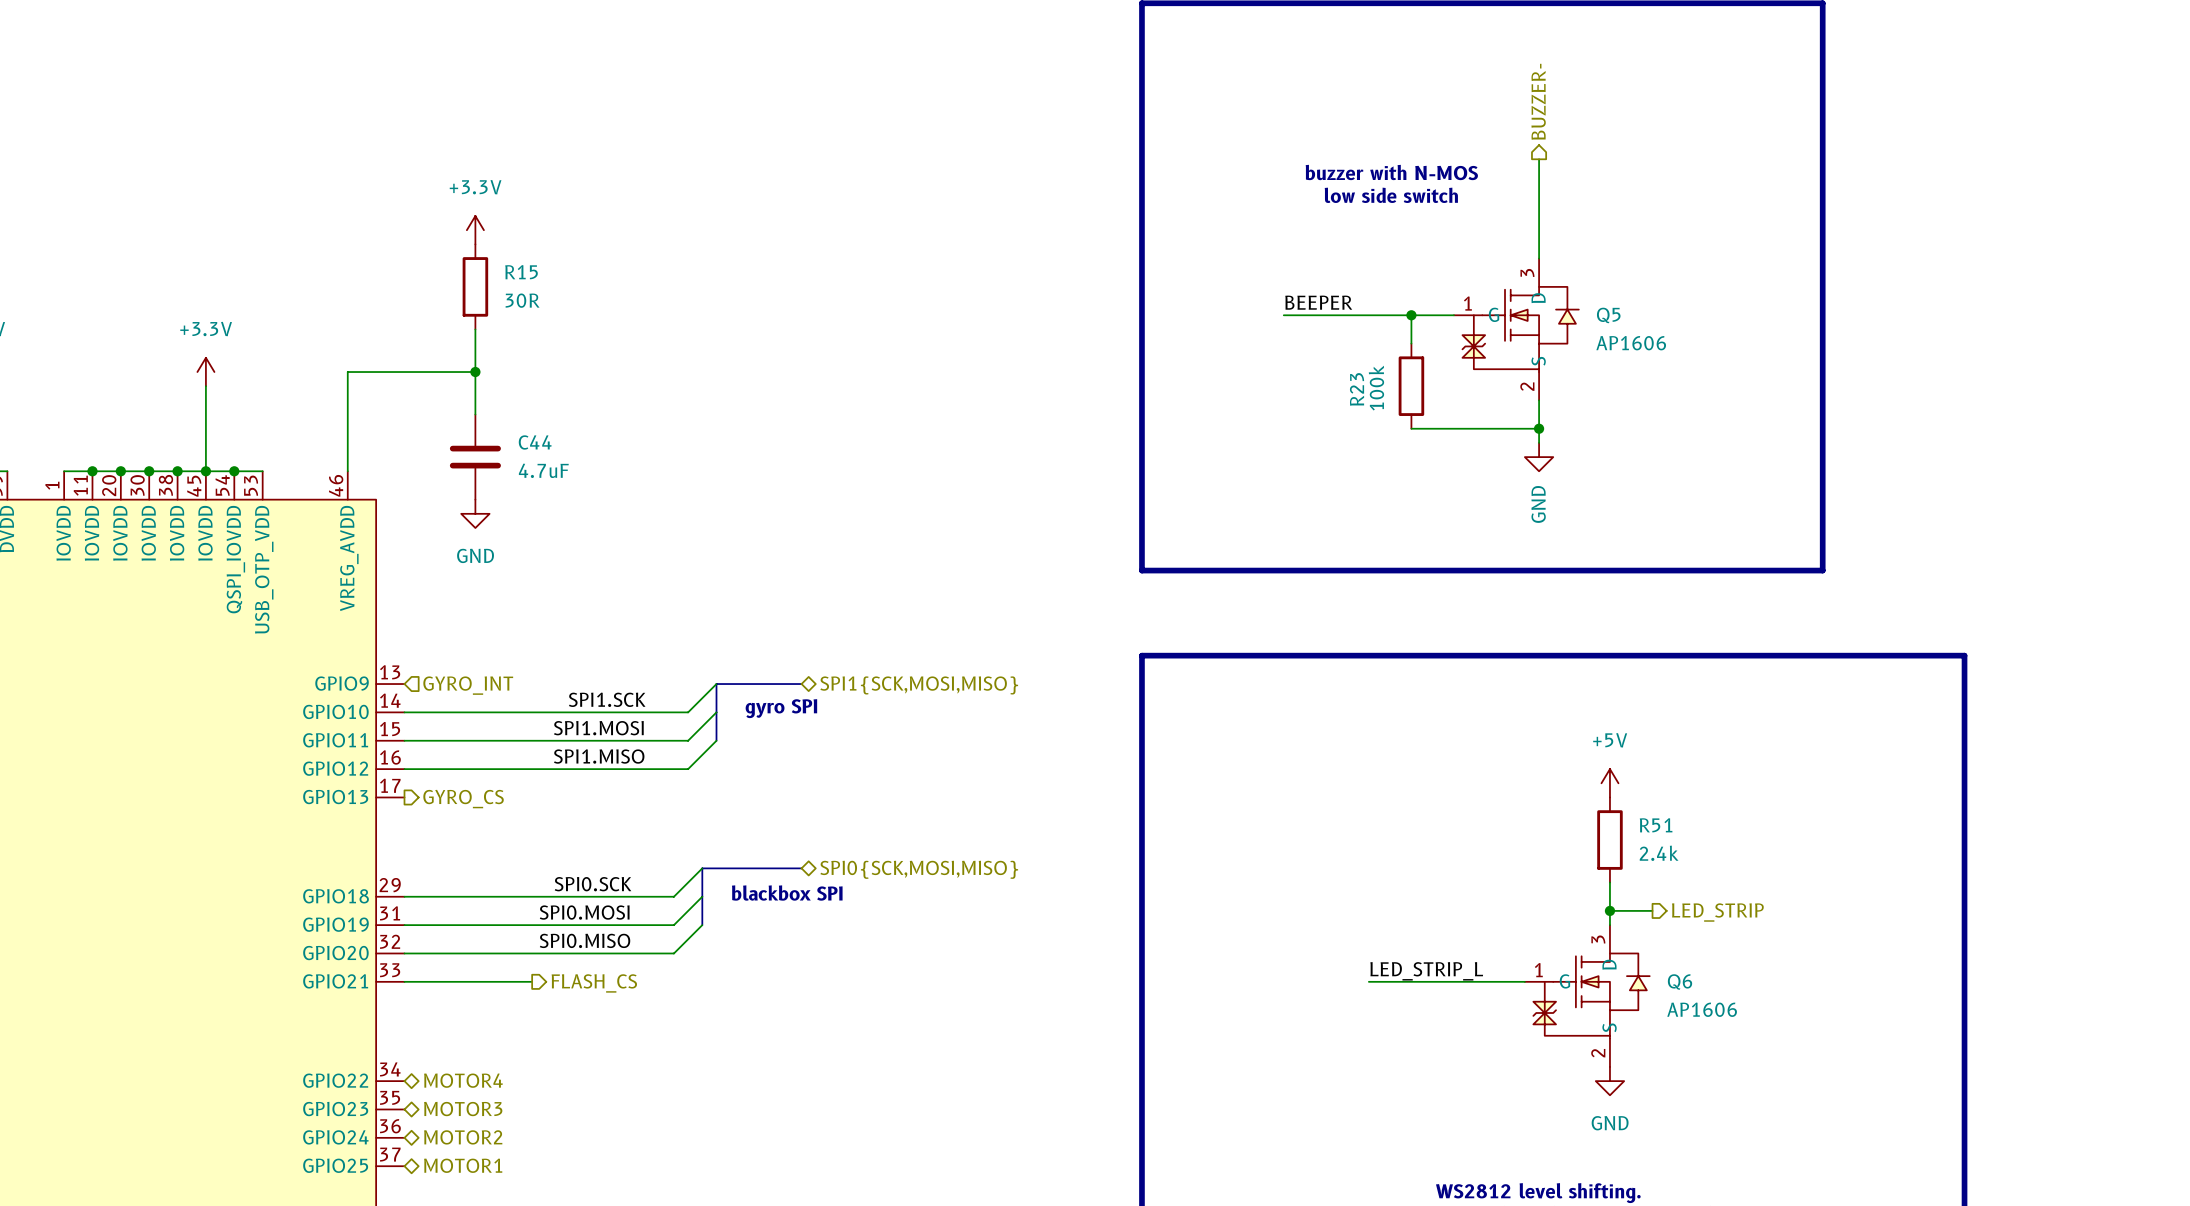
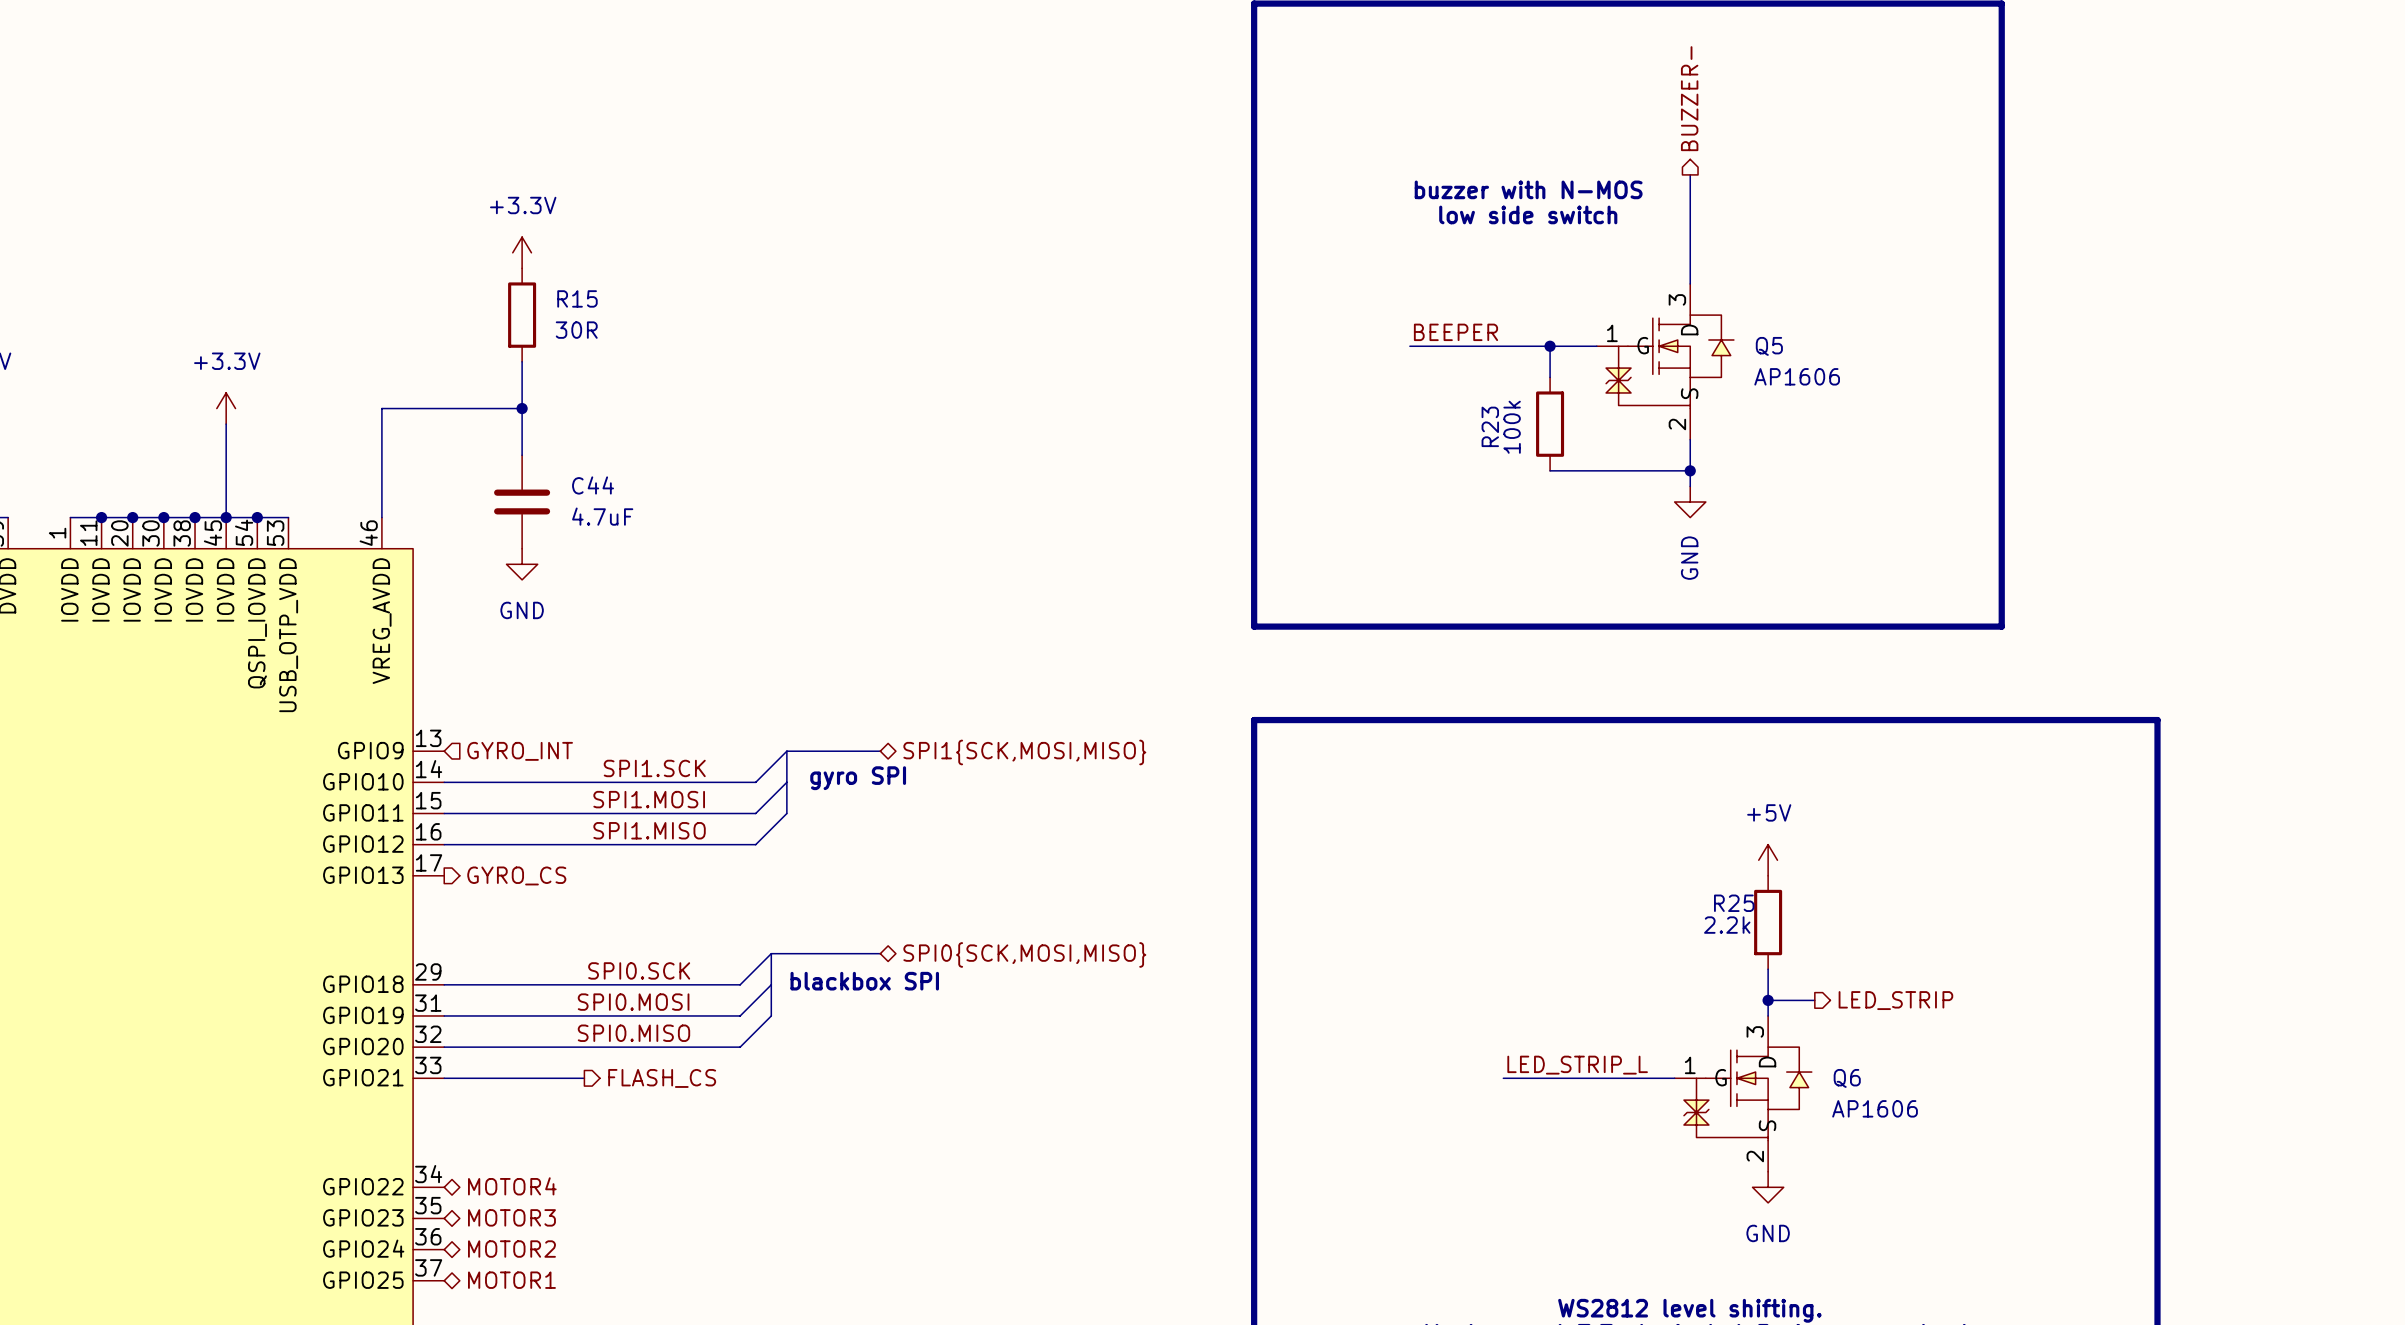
R51 name: R51 (1656, 825) -> R25 (1734, 903)
R51 value: 2.4k (1659, 853) -> 2.2k (1727, 925)

